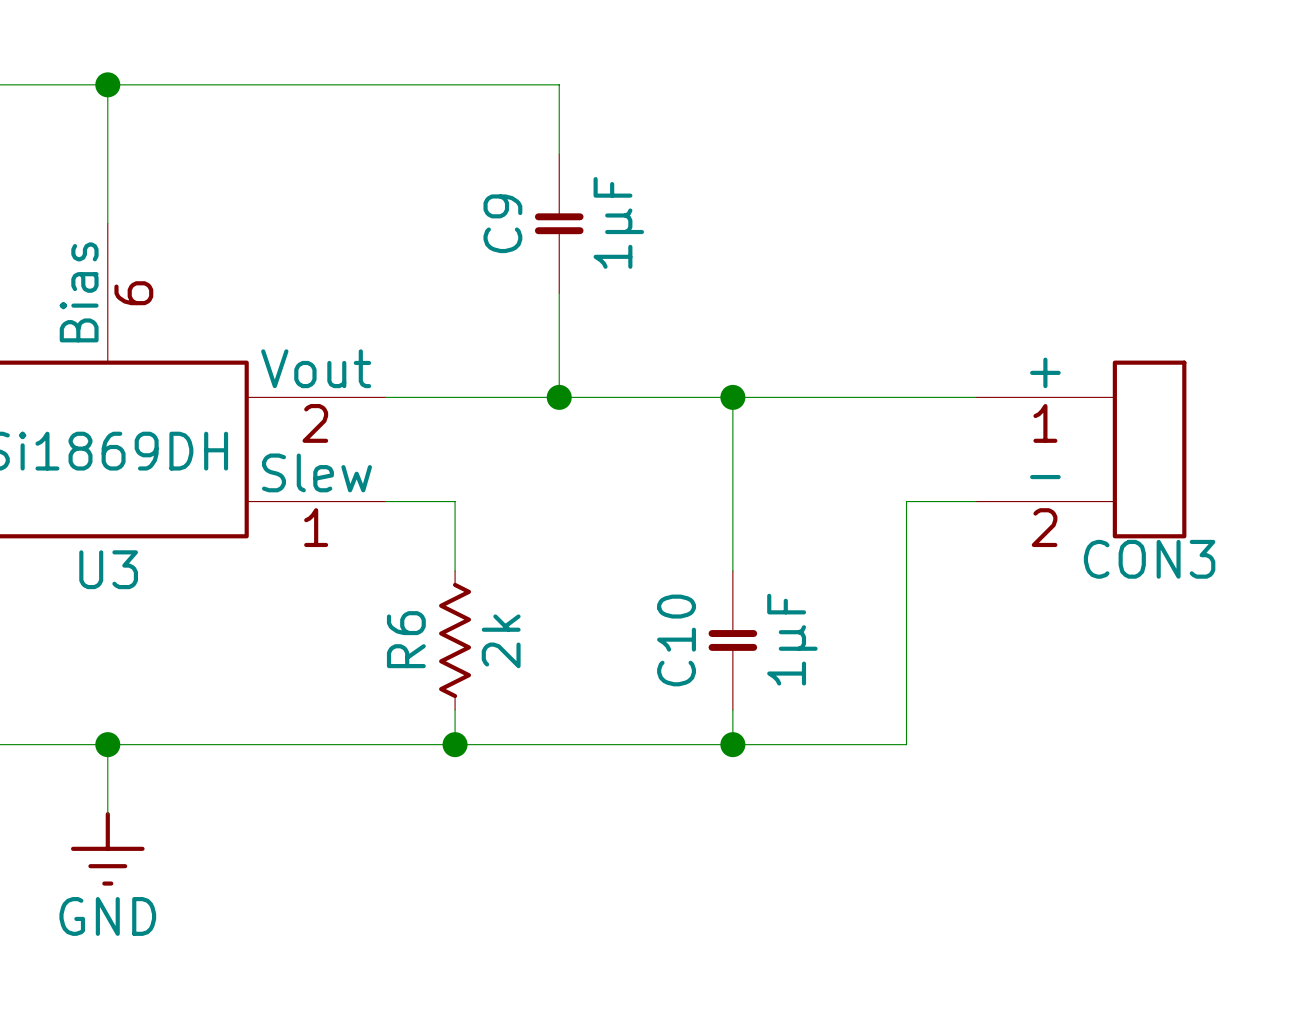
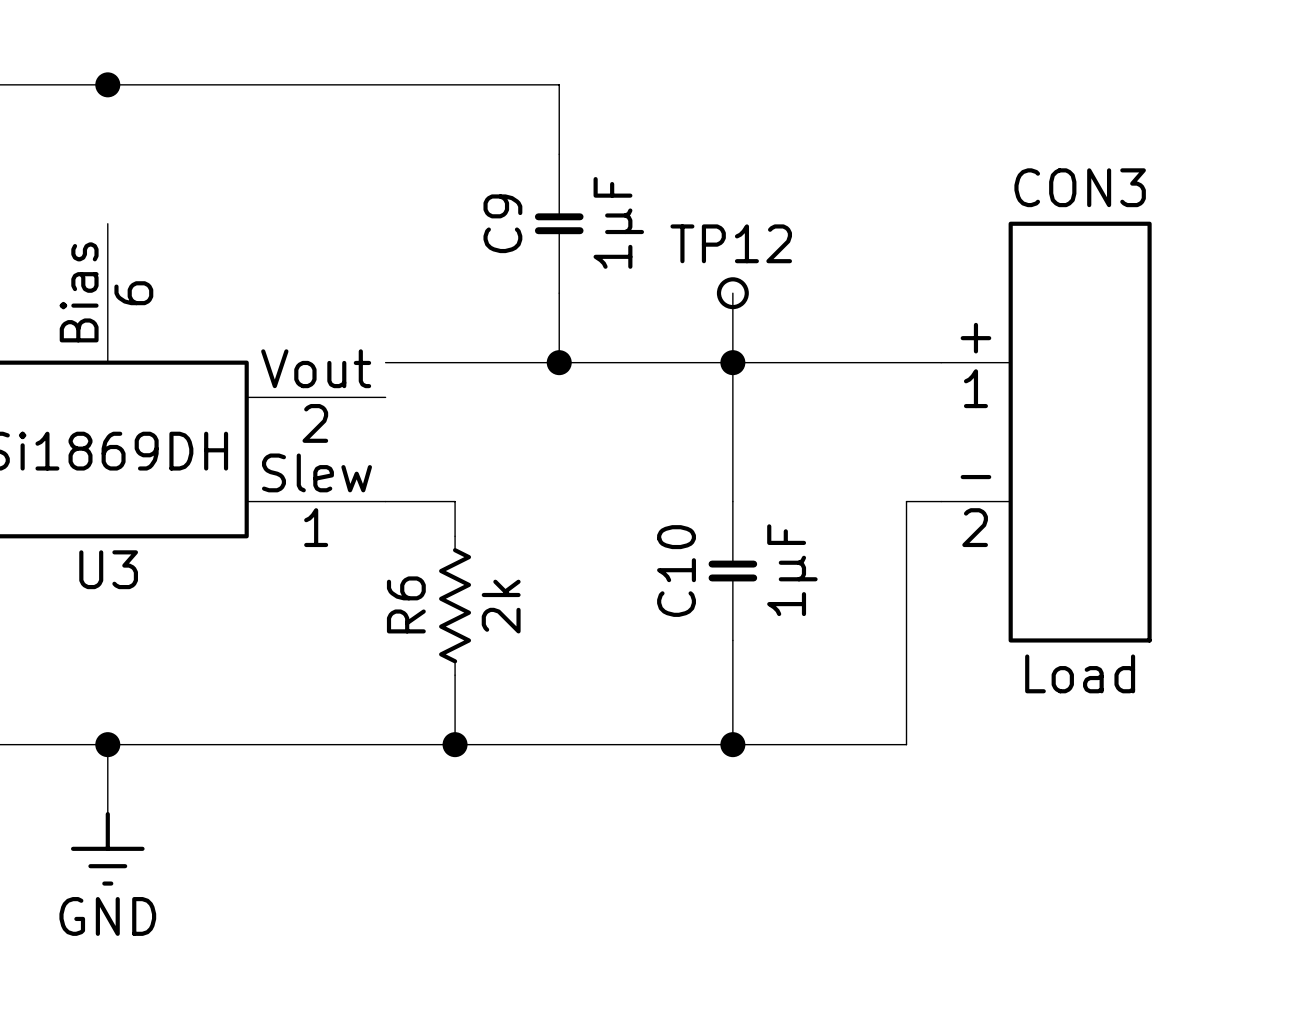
wire: (107, 84) (107, 223) -> none
wire: none -> (732, 293) (732, 397)
TP12: none -> (732, 293)
CON3 symbol: [975, 360, 1187, 539] -> [941, 221, 1152, 643]
wire: none -> (385, 362) (941, 362)
wire: (559, 362) (559, 397) -> none
wire: (385, 397) (975, 397) -> none
junction position: (559, 397) -> (559, 362)
junction position: (732, 397) -> (732, 362)
CON3 name position: CON3 (1149, 559) -> CON3 (1080, 187)
R6 position: (455, 640) -> (455, 605)
C10 position: (732, 640) -> (732, 571)
CON3 value: none -> Load (1080, 673)

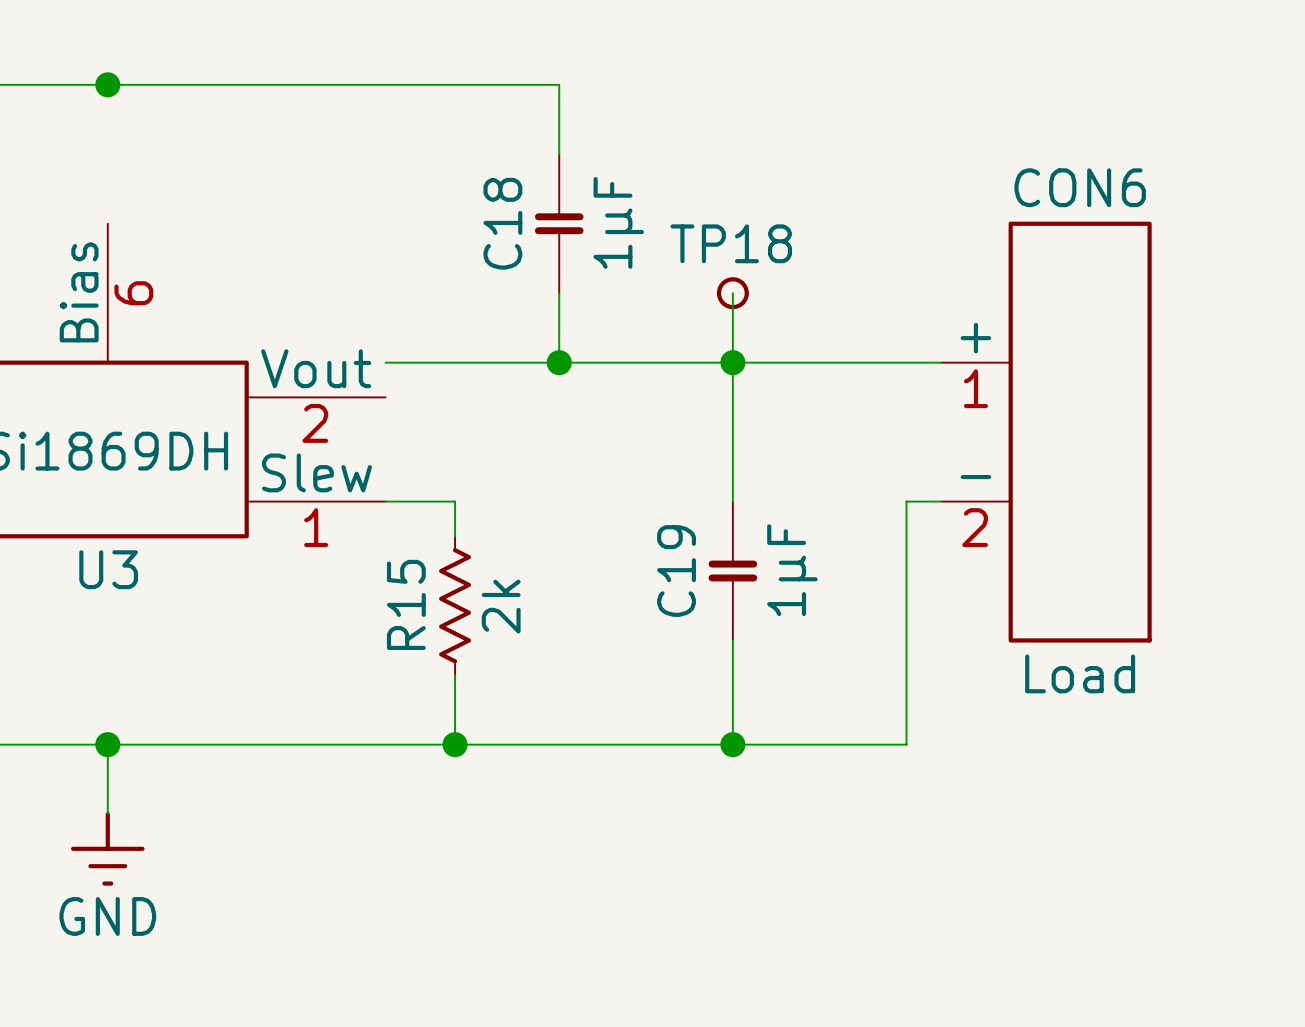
CON3 name: CON3 (1080, 187) -> CON6 (1080, 187)
C9 name: C9 (502, 223) -> C18 (502, 223)
TP12 name: TP12 (731, 243) -> TP18 (731, 243)
C10 name: C10 (676, 571) -> C19 (676, 571)
R6 name: R6 (406, 604) -> R15 (406, 604)

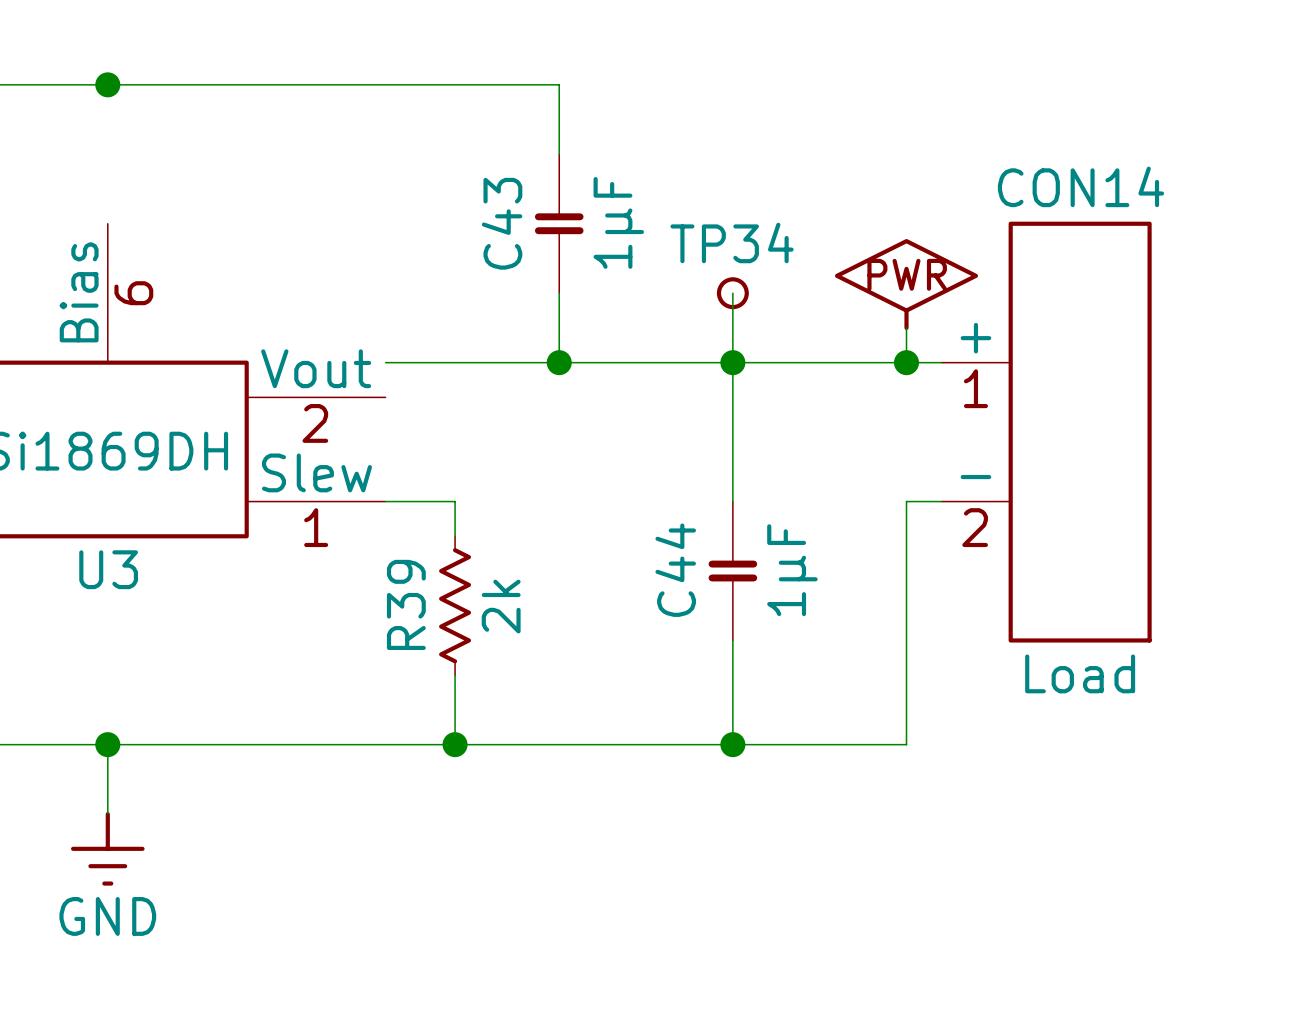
CON6 name: CON6 (1080, 187) -> CON14 (1080, 186)
C18 name: C18 (502, 223) -> C43 (502, 223)
TP18 name: TP18 (731, 243) -> TP34 (732, 242)
power symbol: none -> (906, 284)
wire: none -> (906, 327) (906, 362)
junction: none -> (906, 362)
C19 name: C19 (676, 571) -> C44 (675, 570)
R15 name: R15 (406, 604) -> R39 (406, 604)

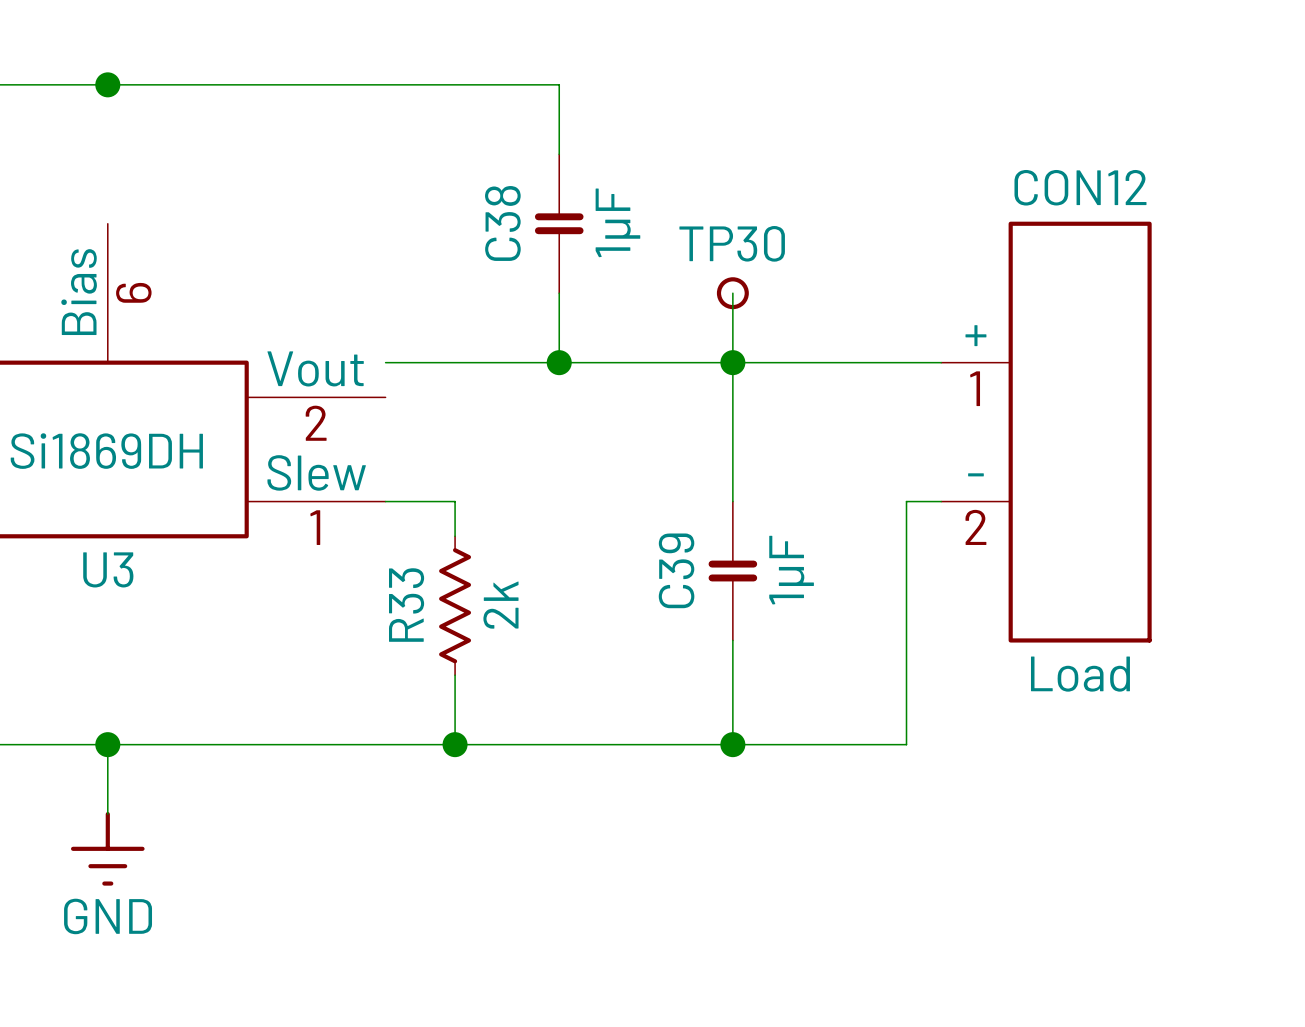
CON14 name: CON14 (1080, 186) -> CON12 (1080, 187)
C43 name: C43 (502, 223) -> C38 (502, 223)
TP34 name: TP34 (732, 242) -> TP30 (732, 243)
power symbol: (906, 284) -> none
wire: (906, 327) (906, 362) -> none
junction: (906, 362) -> none
C44 name: C44 (675, 570) -> C39 (676, 570)
R39 name: R39 (406, 604) -> R33 (406, 605)

